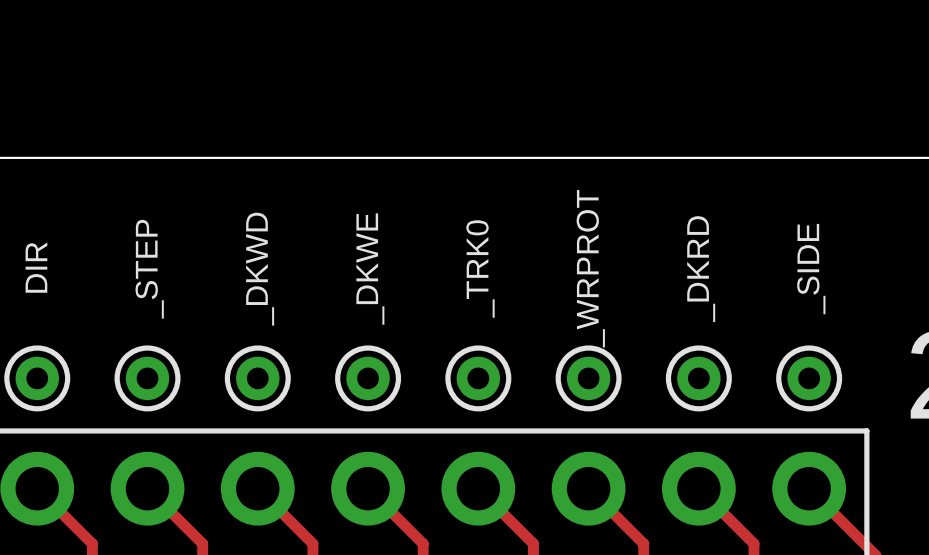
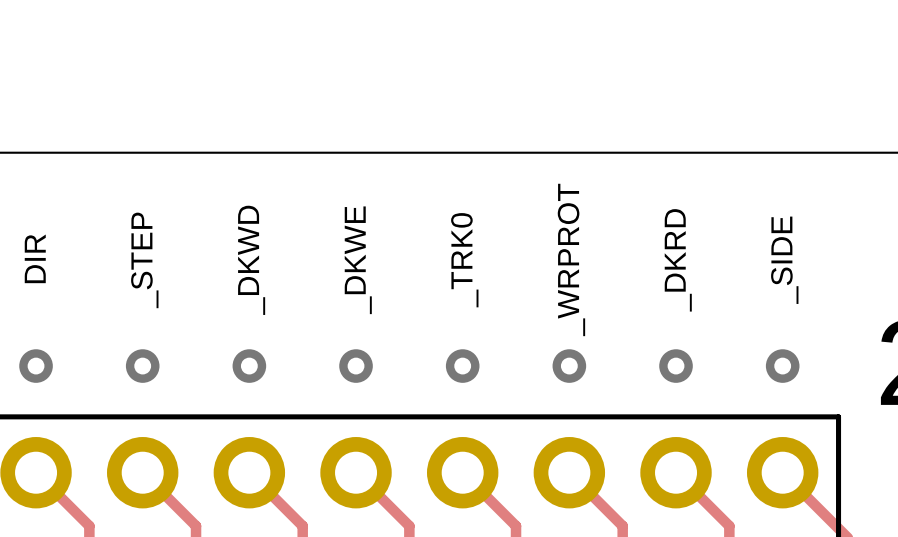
part: (37, 378) -> none
via: none -> (36, 366)
part: (147, 378) -> none
via: none -> (142, 366)
part: (257, 378) -> none
via: none -> (249, 366)
part: (368, 378) -> none
via: none -> (356, 366)
part: (478, 378) -> none
via: none -> (462, 366)
part: (588, 378) -> none
via: none -> (569, 366)
part: (698, 378) -> none
via: none -> (676, 366)
part: (809, 378) -> none
via: none -> (782, 366)

